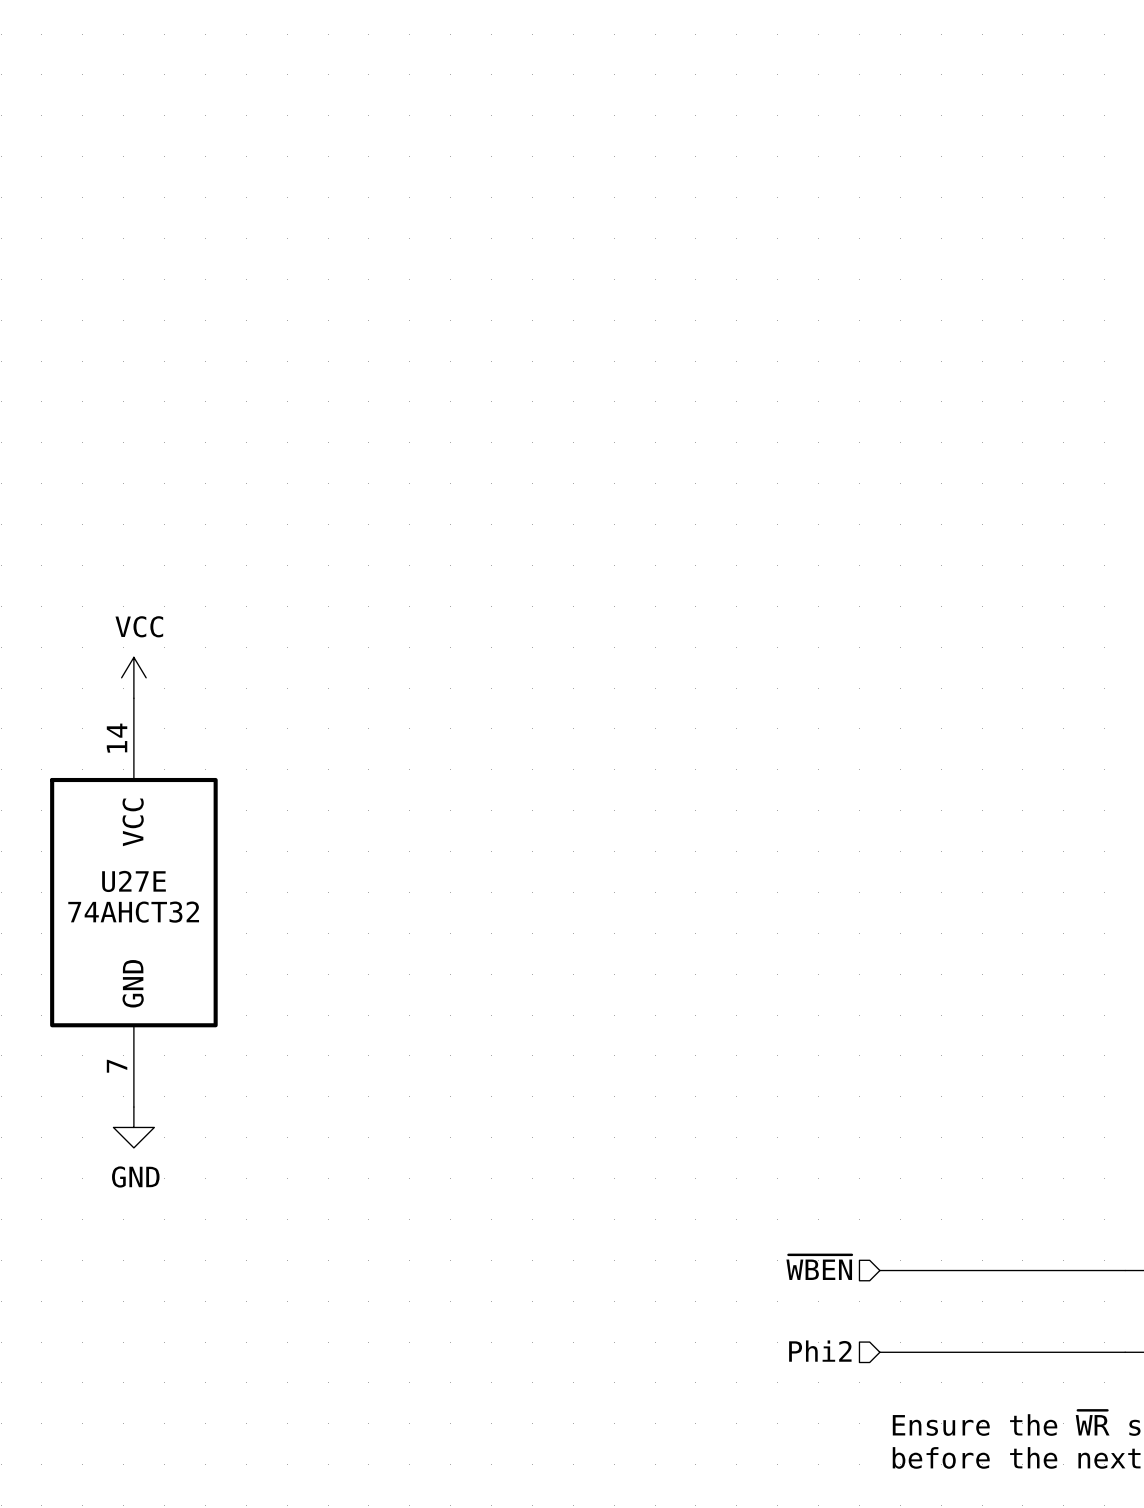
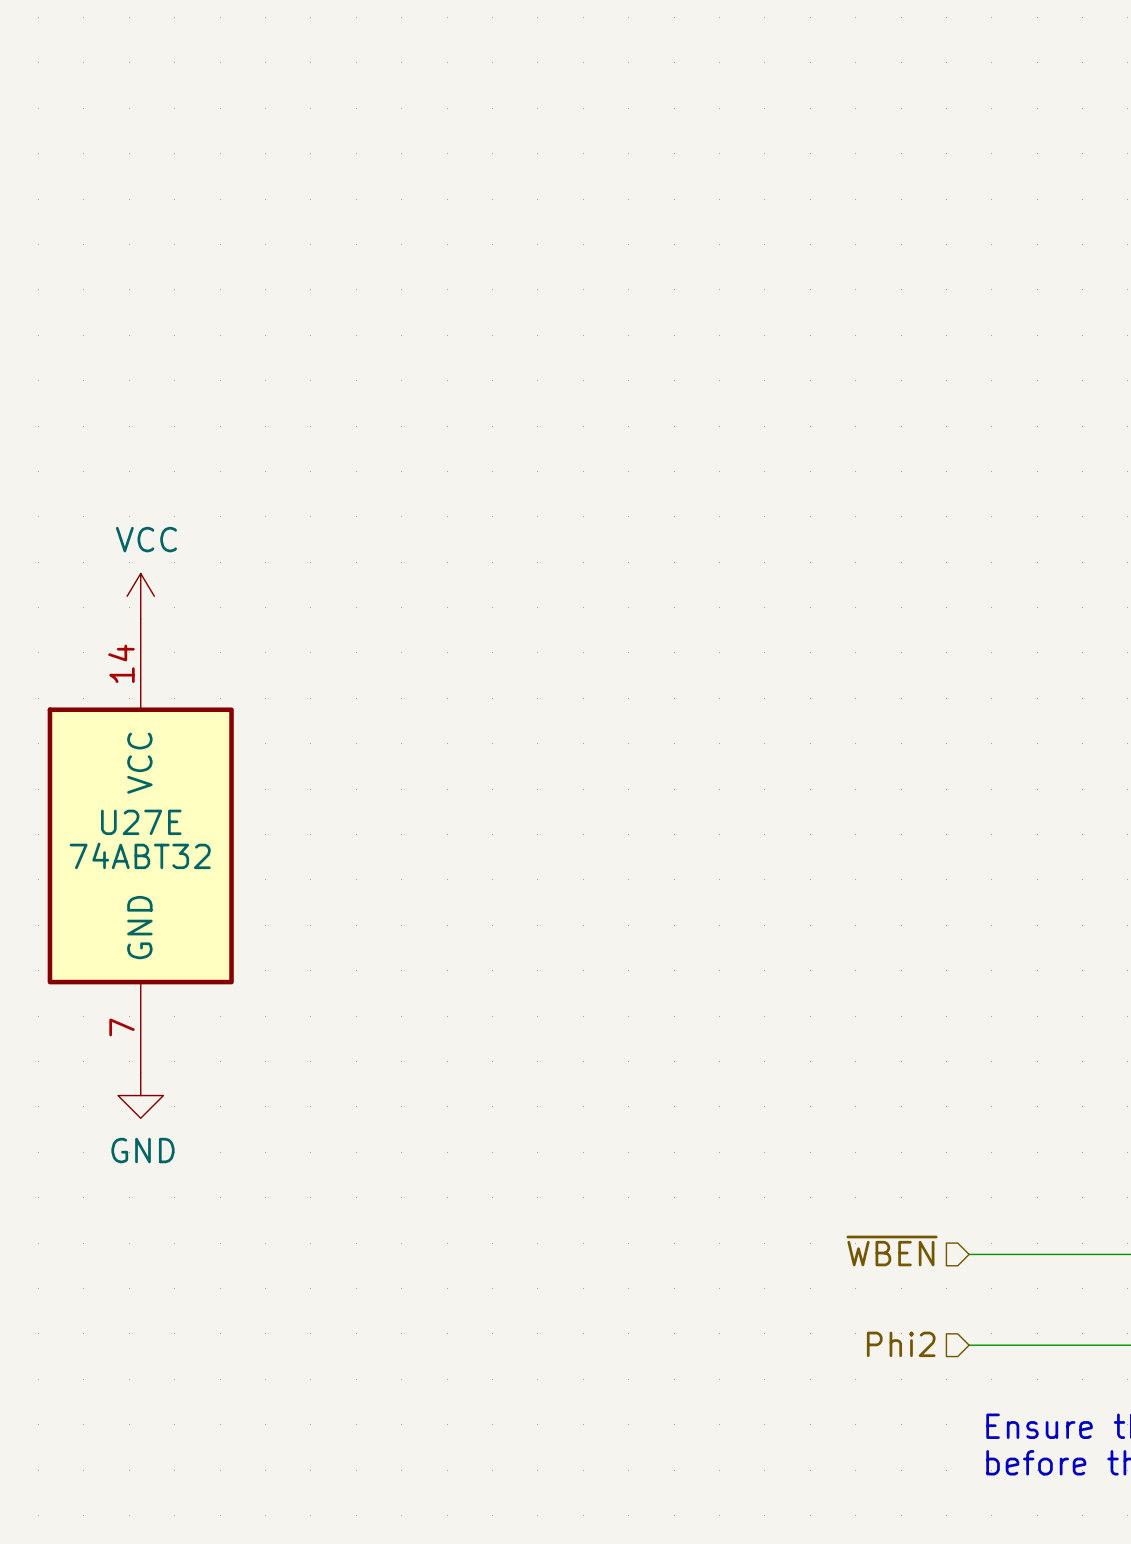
U27E value: 74AHCT32 (133, 912) -> 74ABT32 (140, 855)

